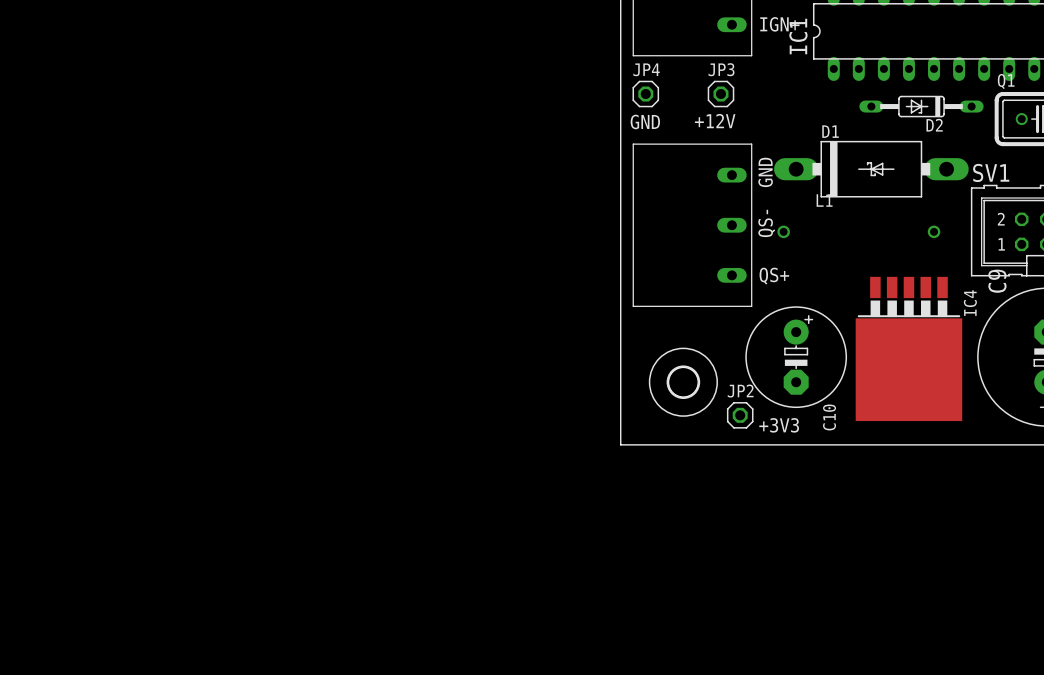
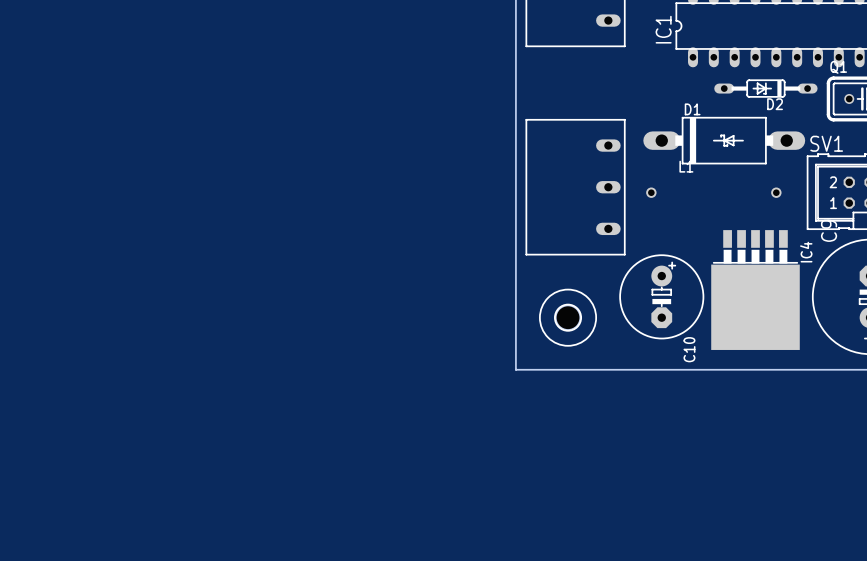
text: IGN+ (779, 24) -> none
JP4: (645, 94) -> none
JP3: (720, 94) -> none
text: GND (645, 121) -> none
text: +12V (715, 121) -> none
text: GND (765, 172) -> none
text: QS- (766, 223) -> none
text: QS+ (774, 276) -> none
JP2: (740, 415) -> none
text: +3V3 (779, 425) -> none

